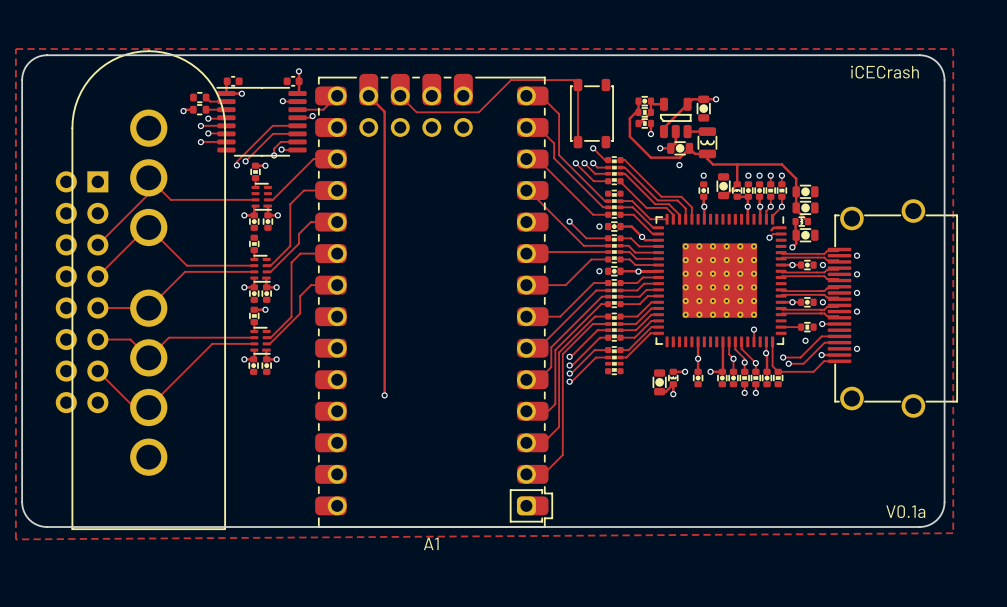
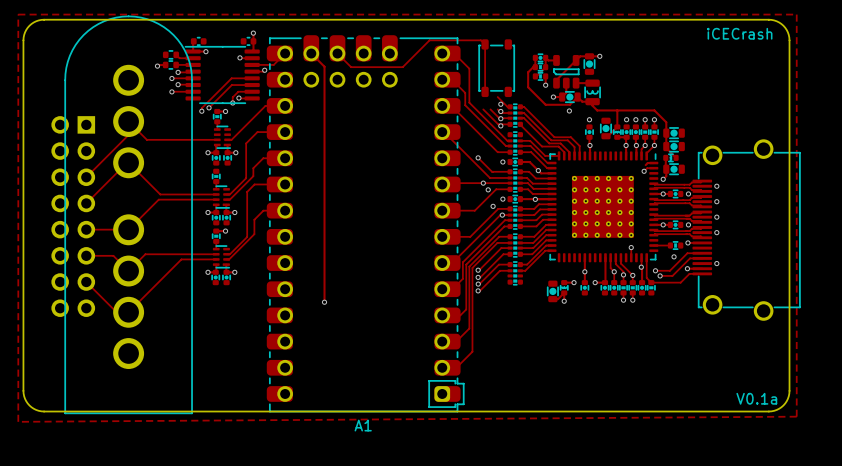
via: (593, 148) -> none
via: none -> (500, 104)
via: (575, 163) -> none
via: (584, 163) -> none
via: (593, 163) -> none
via: none -> (500, 111)
via: none -> (500, 118)
via: none -> (500, 125)
via: none -> (483, 183)
via: none -> (488, 189)
via: none -> (493, 206)
via: none -> (502, 215)

